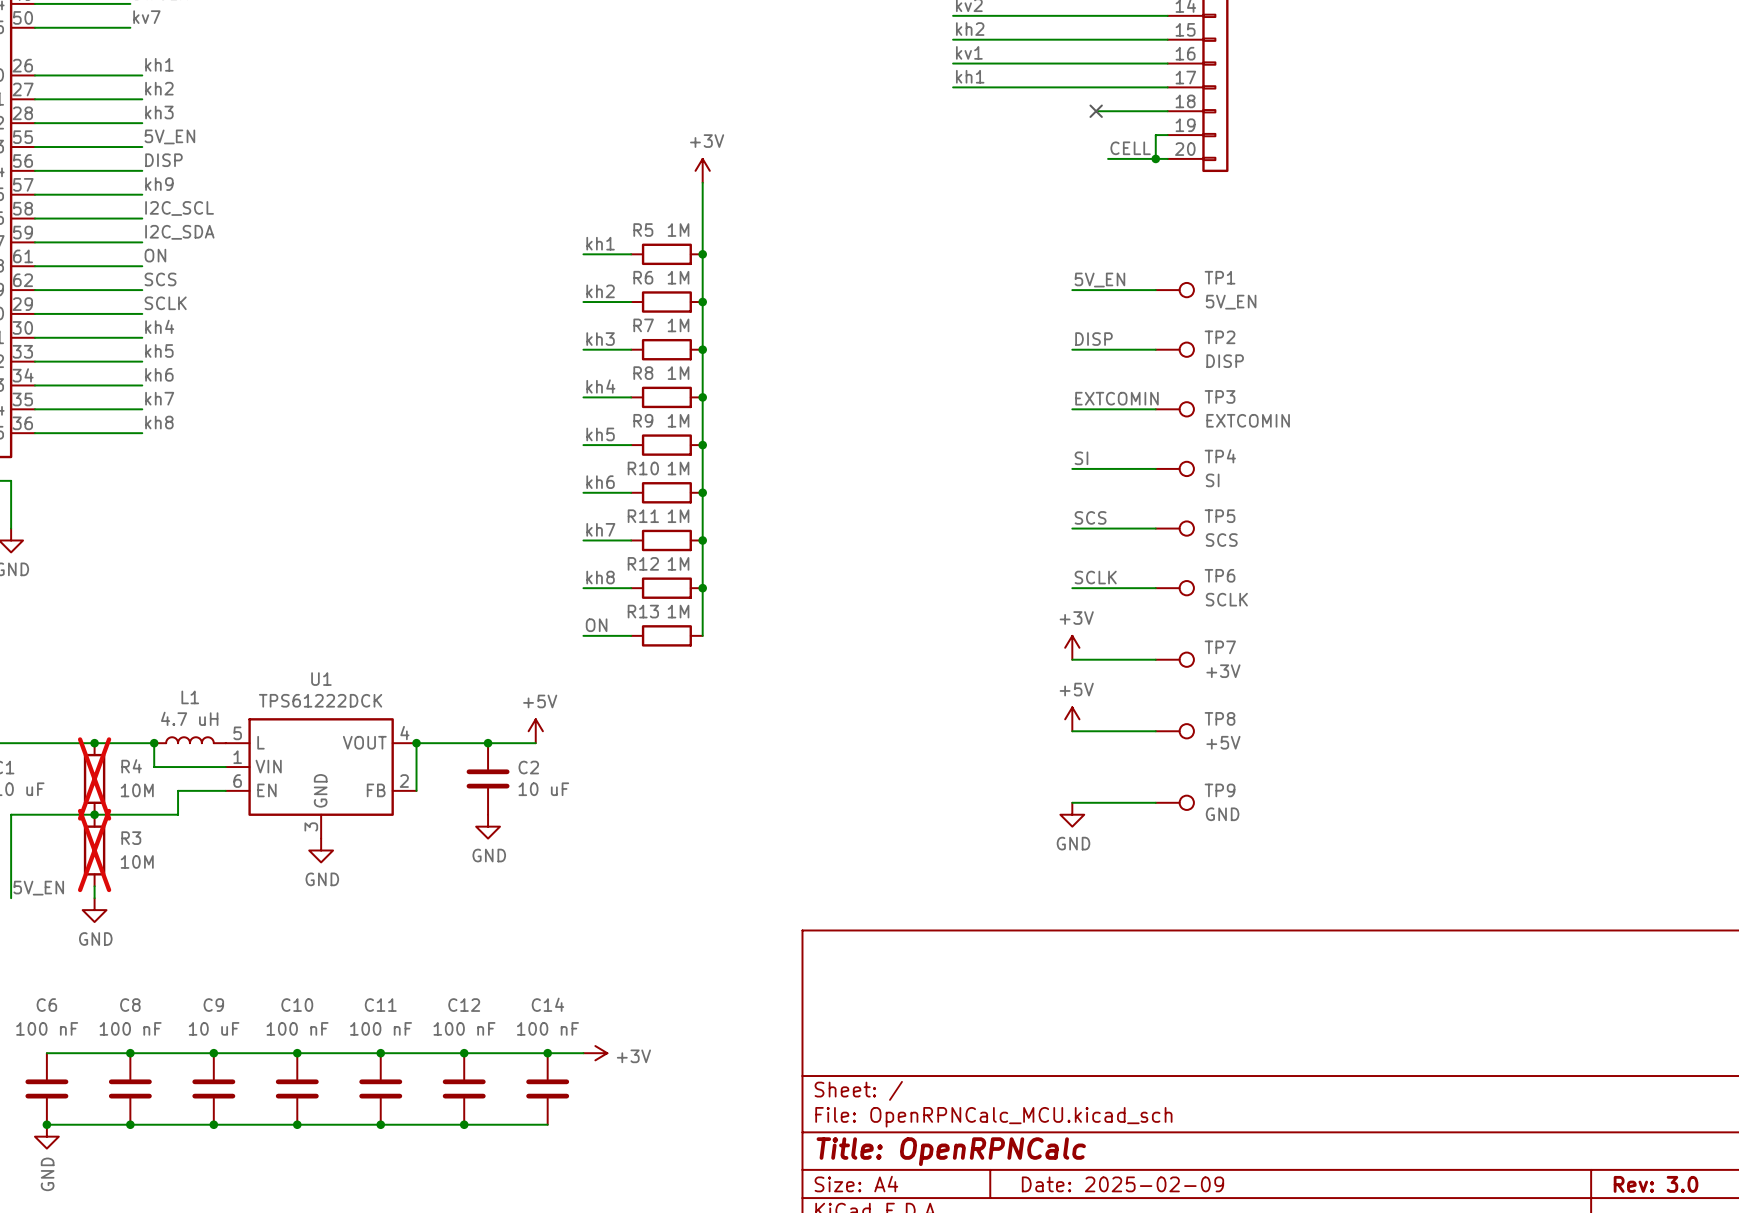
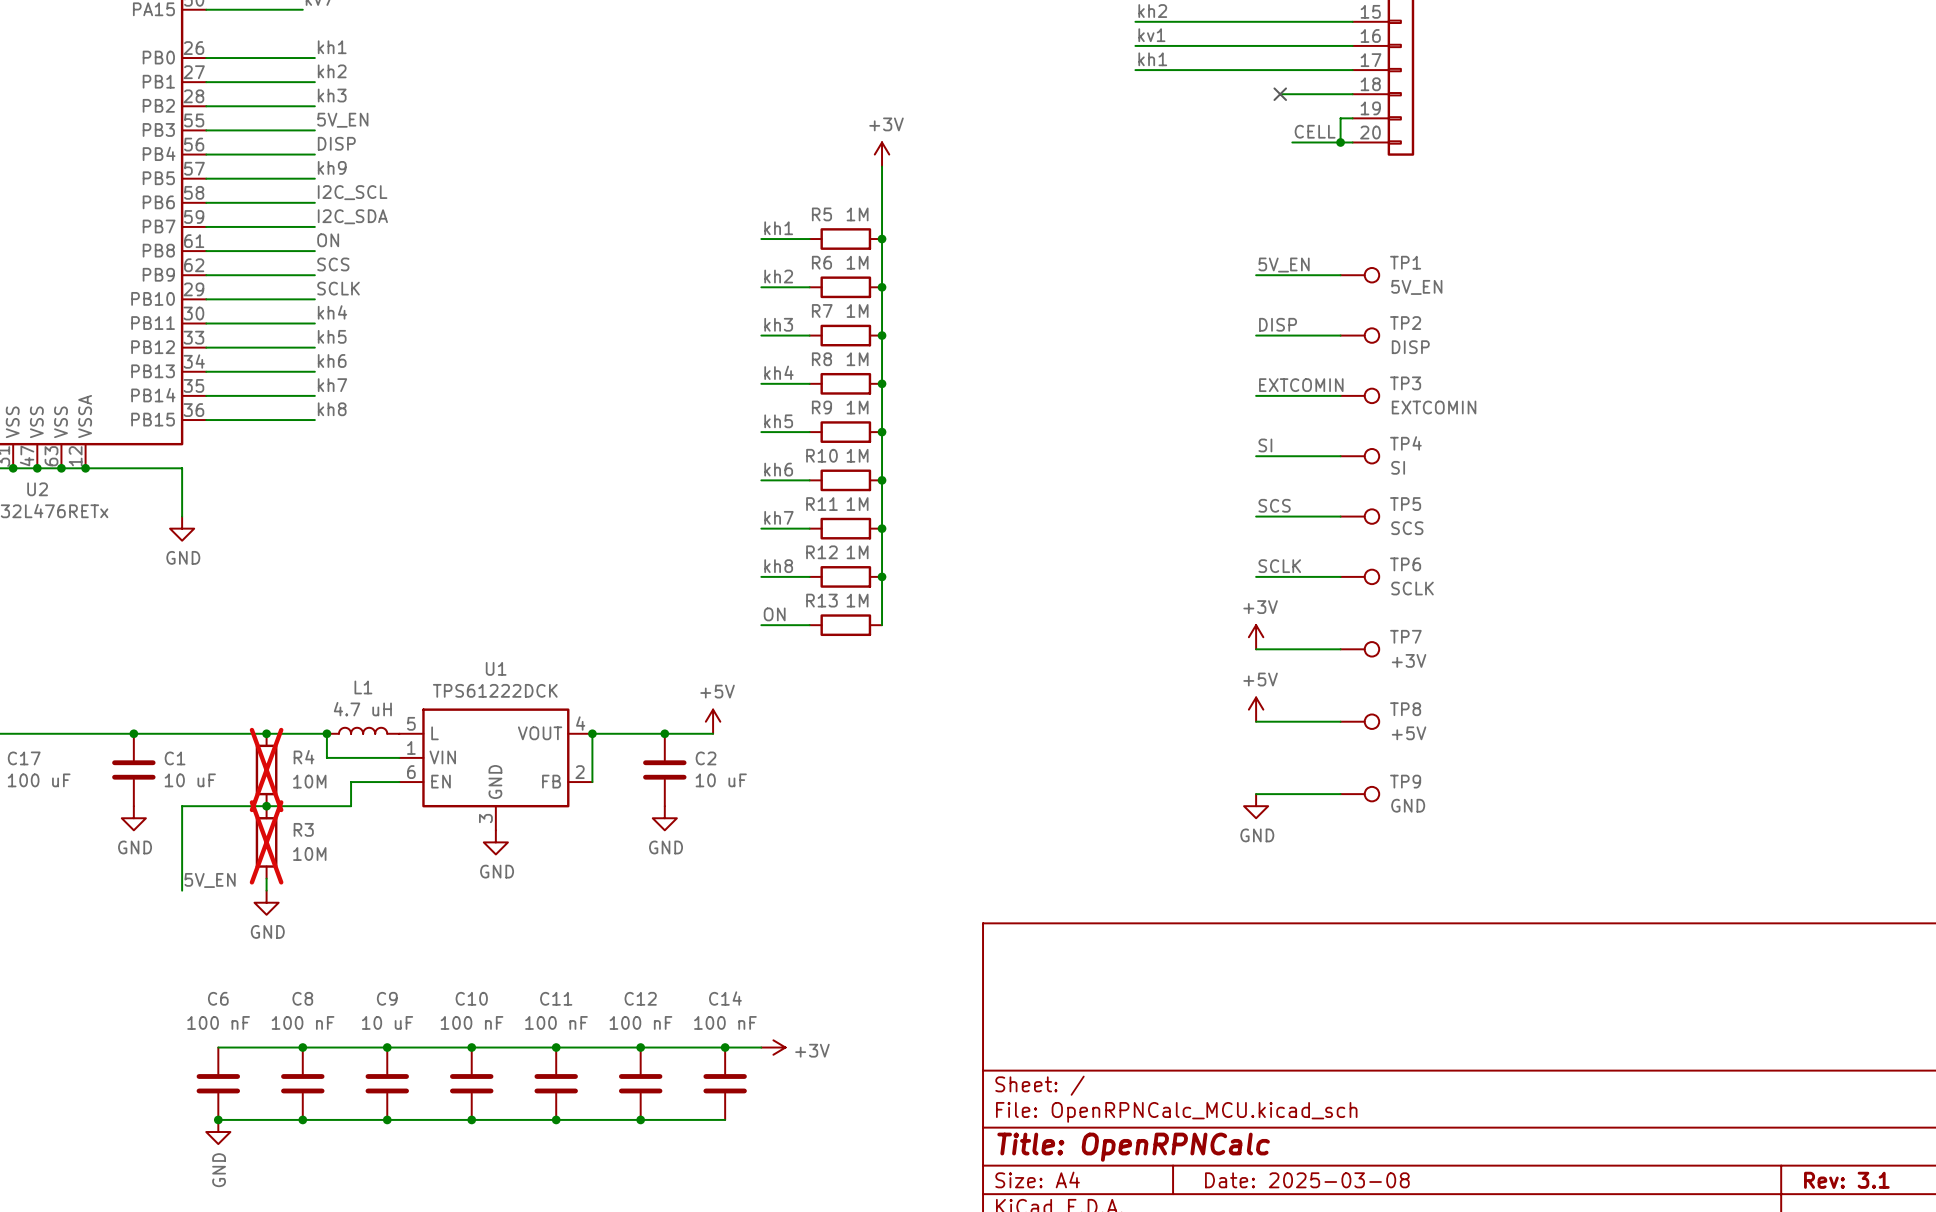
title block: Date: 2025-02-09 (1122, 1184) -> Date: 2025-03-08 (1307, 1180)
title block: Rev: 3.0 (1656, 1184) -> Rev: 3.1 (1846, 1180)

